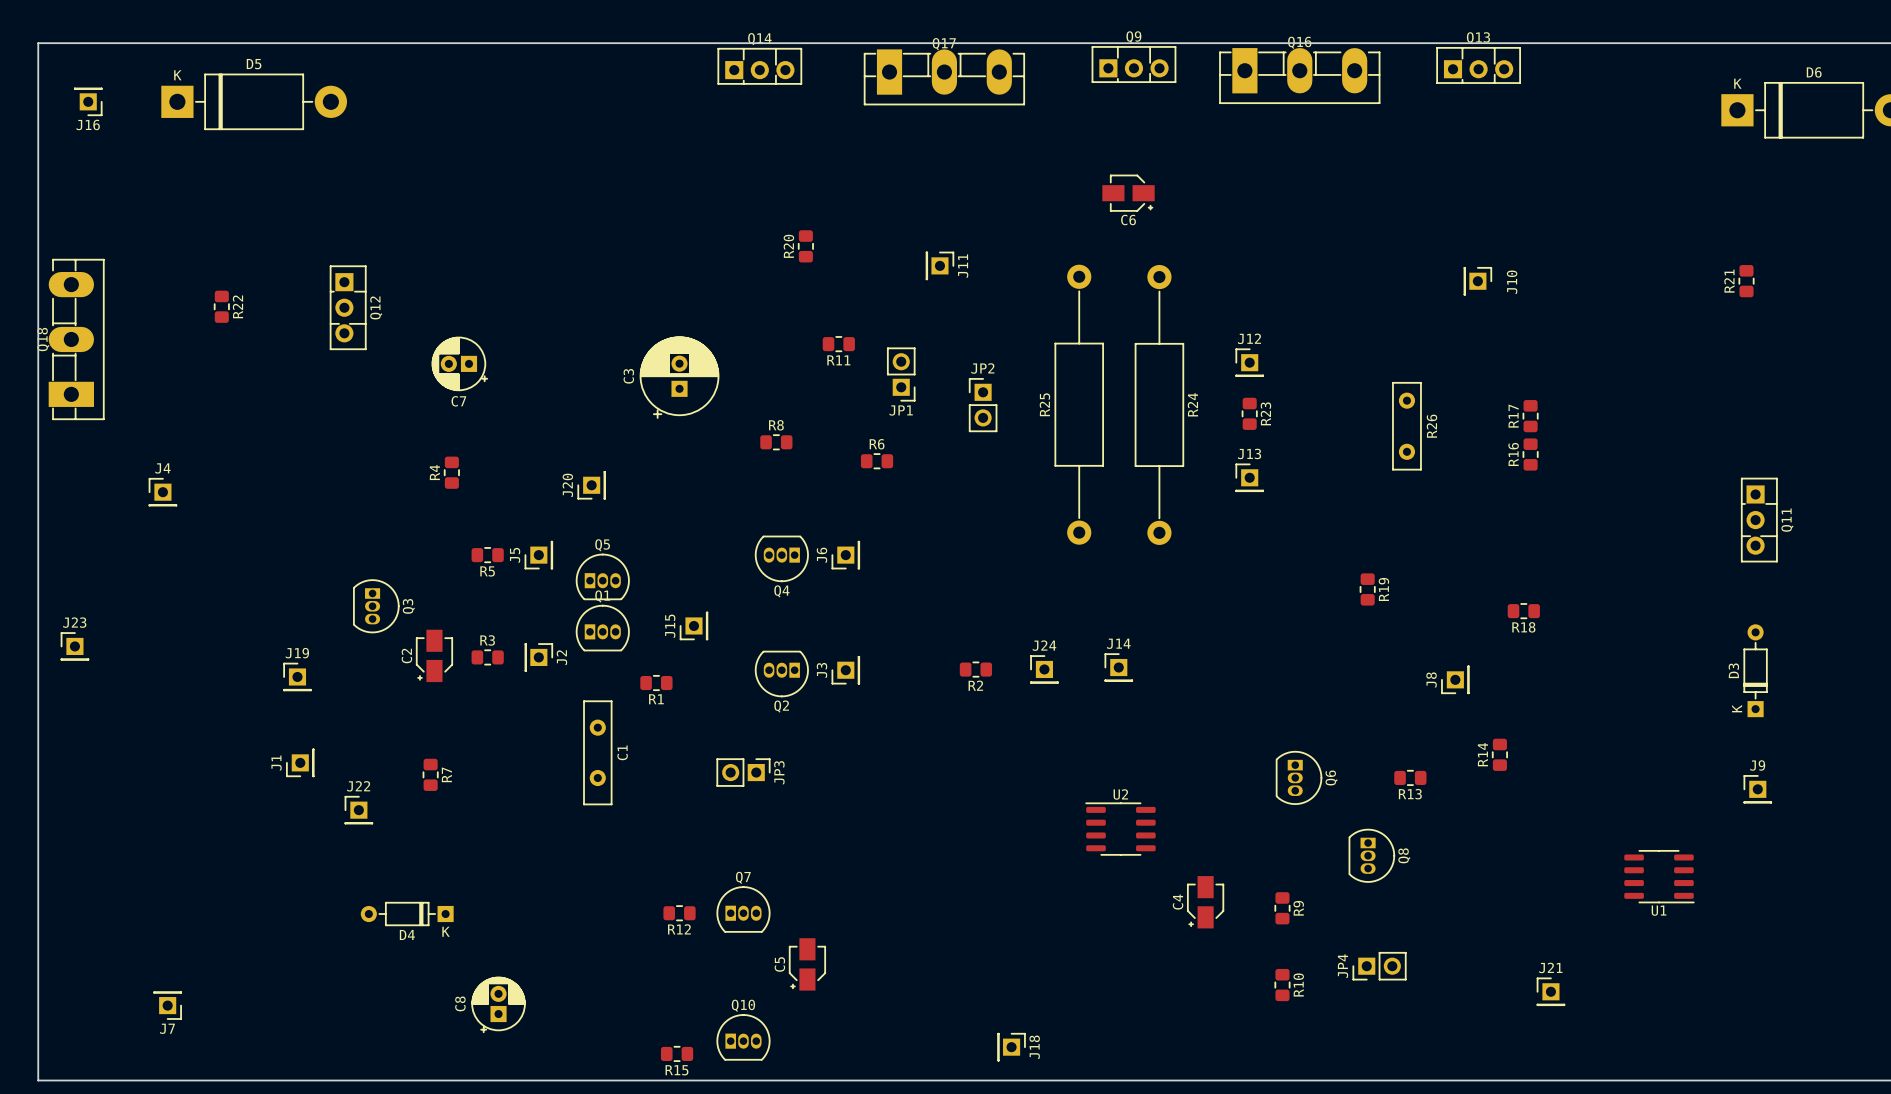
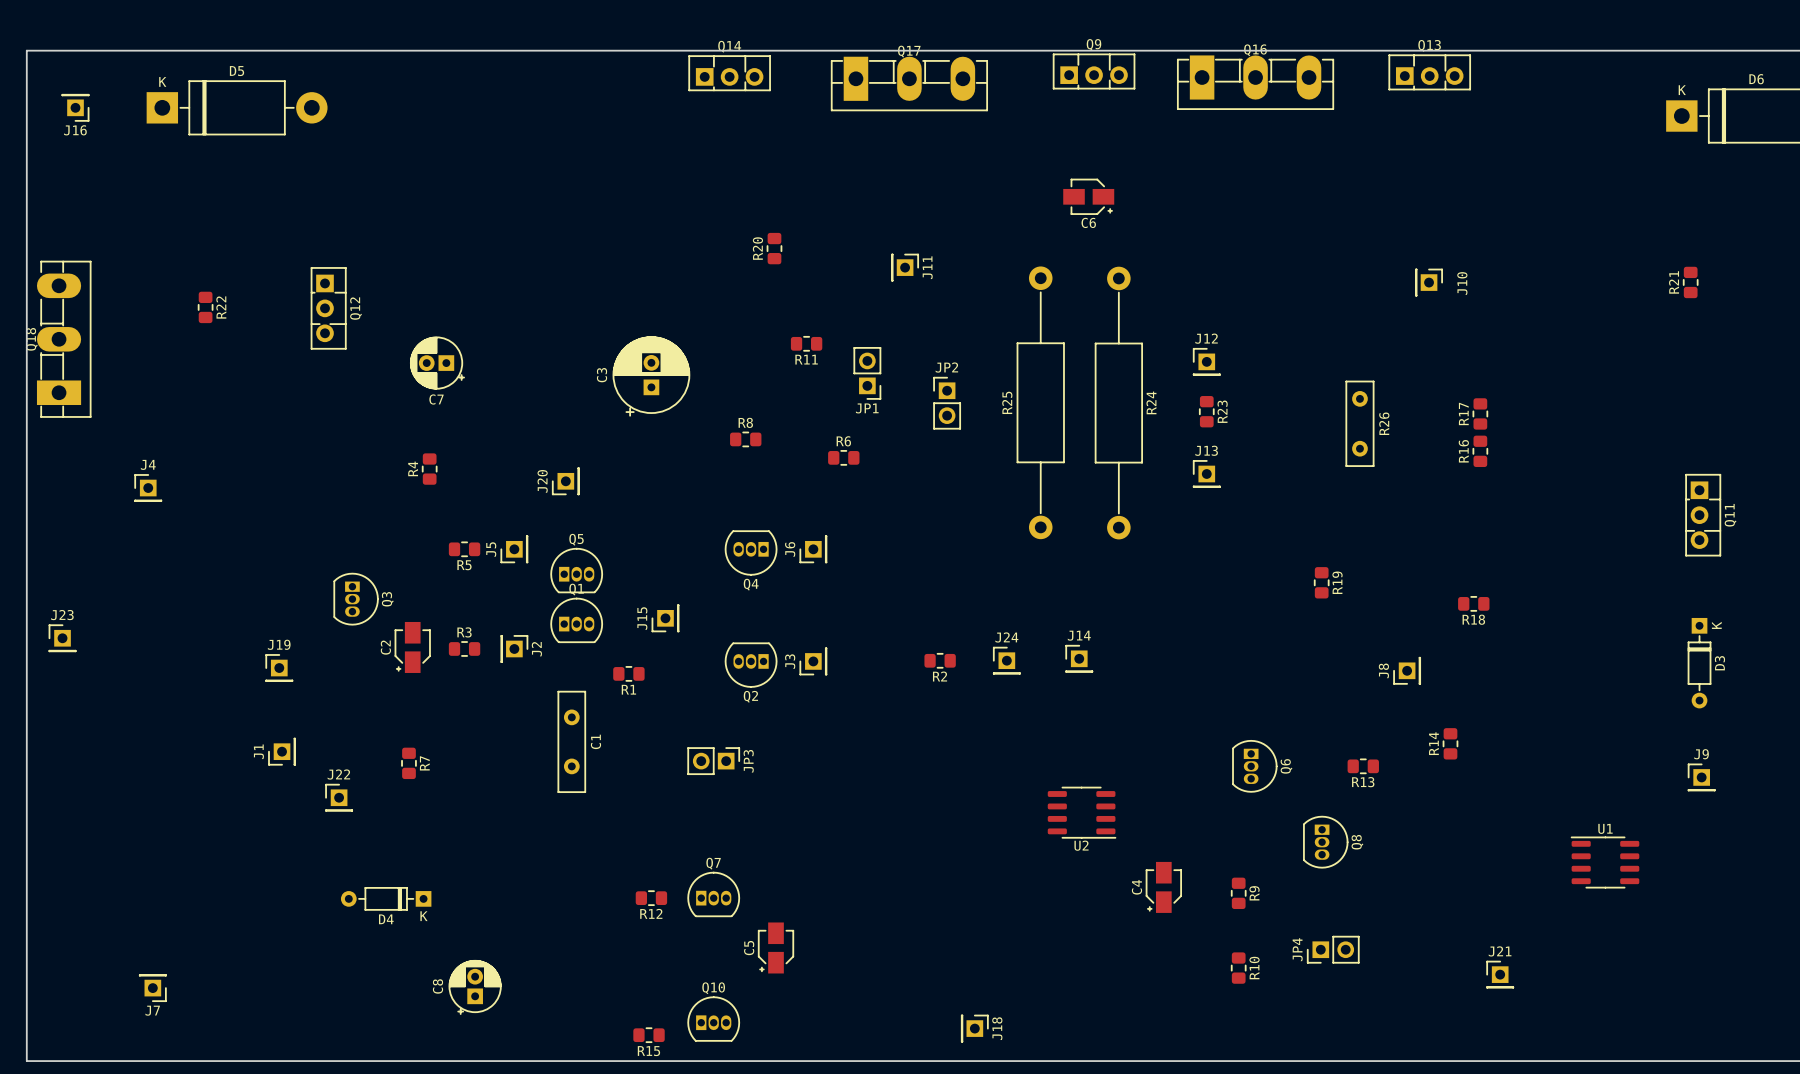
D3 rotation: 0° (1755, 670) -> 180° (1699, 663)
U2 rotation: 0° (1120, 829) -> 180° (1081, 812)
U1 rotation: 0° (1659, 876) -> 180° (1605, 862)

